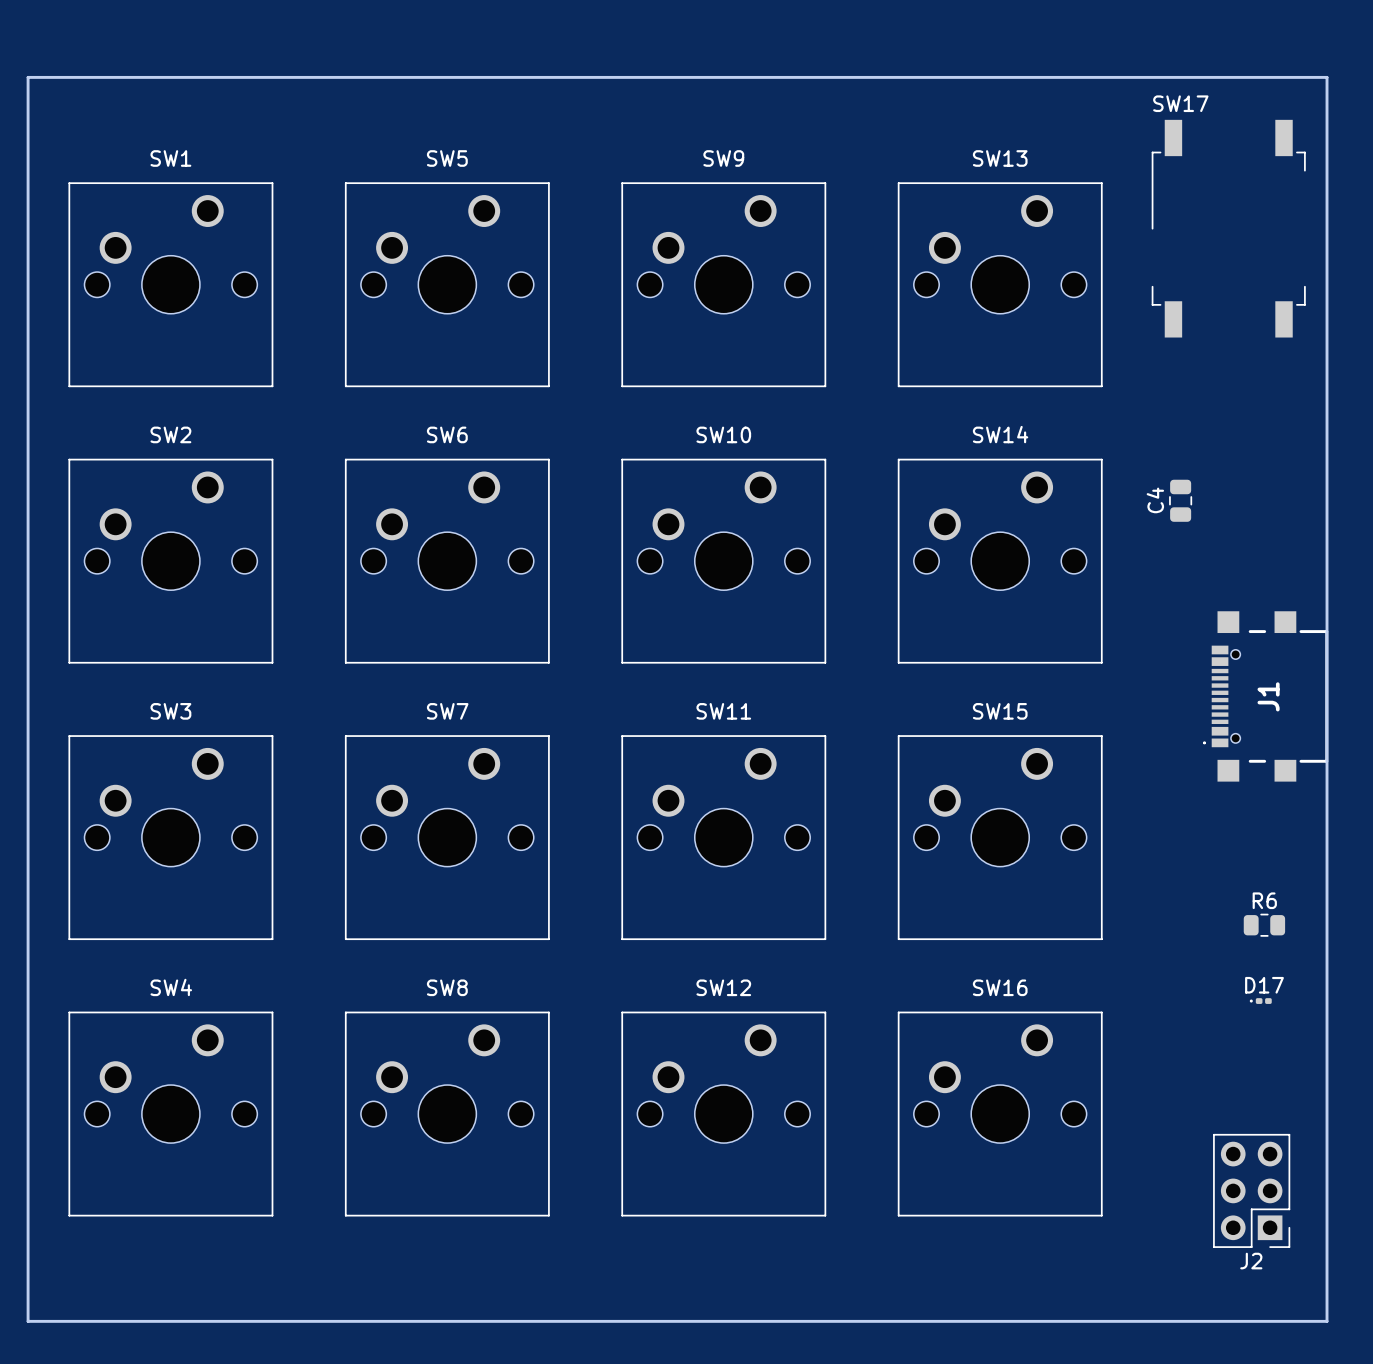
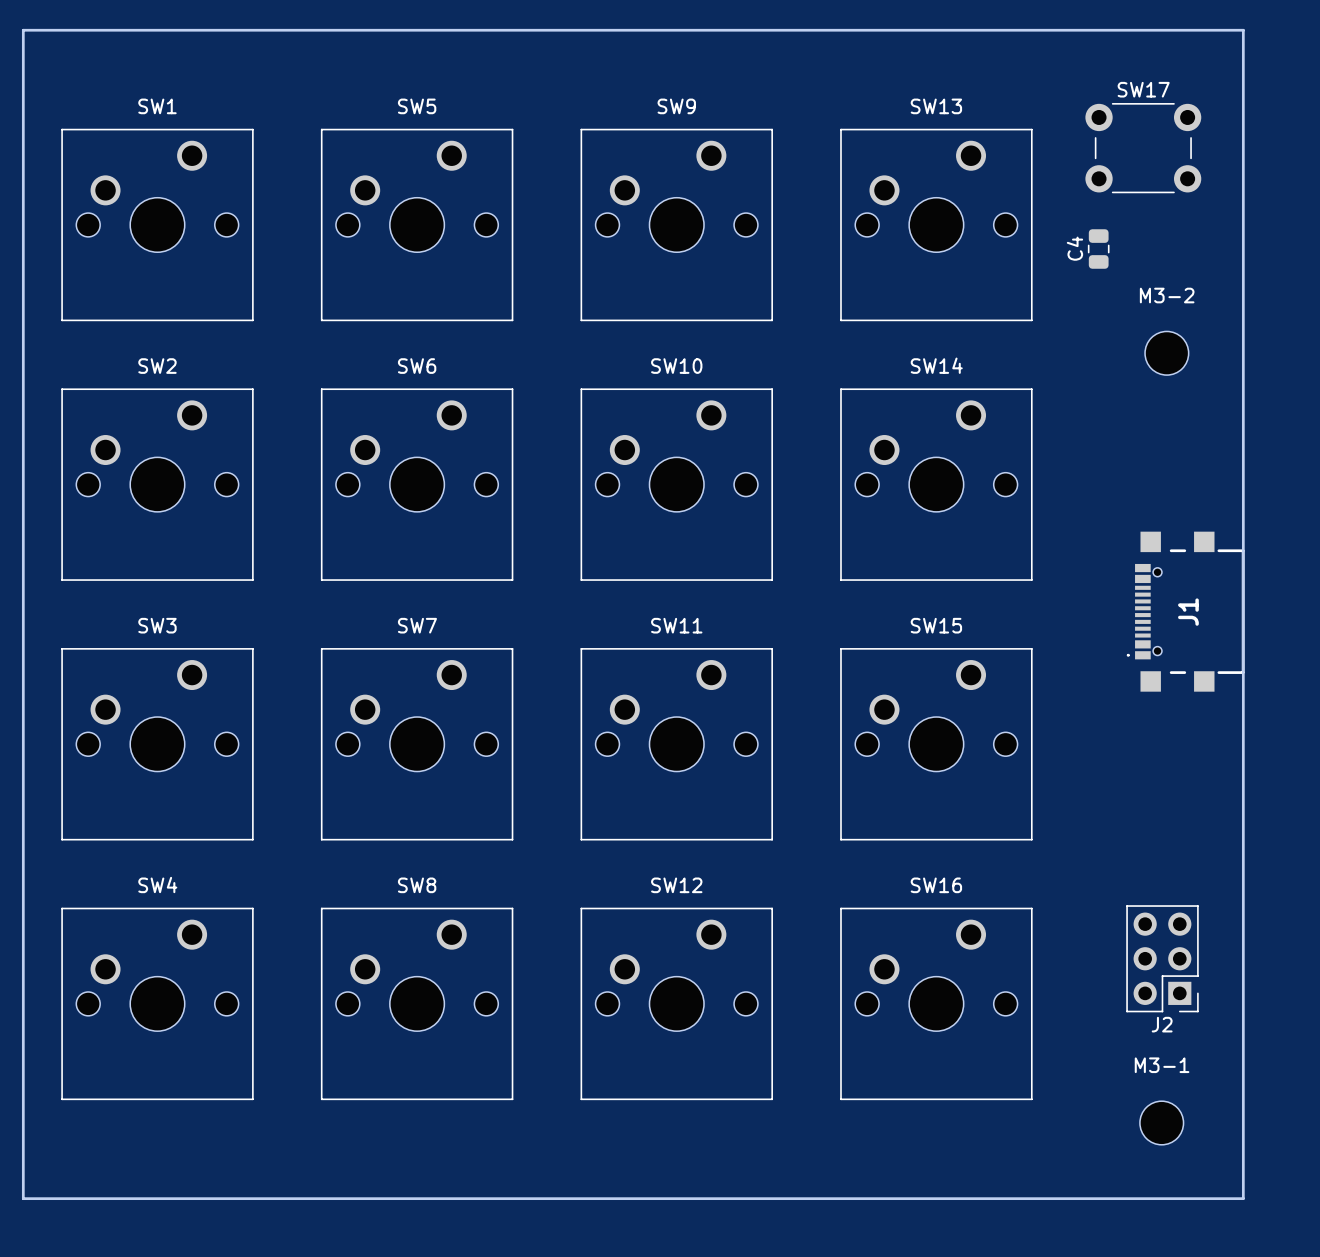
SW17 name position: SW17 (1180, 103) -> SW17 (1143, 89)
SW17 footprint: [1151, 119, 1306, 338] -> [1085, 103, 1202, 194]
M3-2: none -> (1166, 353)
C4 position: (1180, 500) -> (1098, 249)
R6: (1264, 925) -> none
D17: (1260, 1001) -> none
J2 position: (1251, 1190) -> (1162, 958)
M3-1: none -> (1161, 1123)

